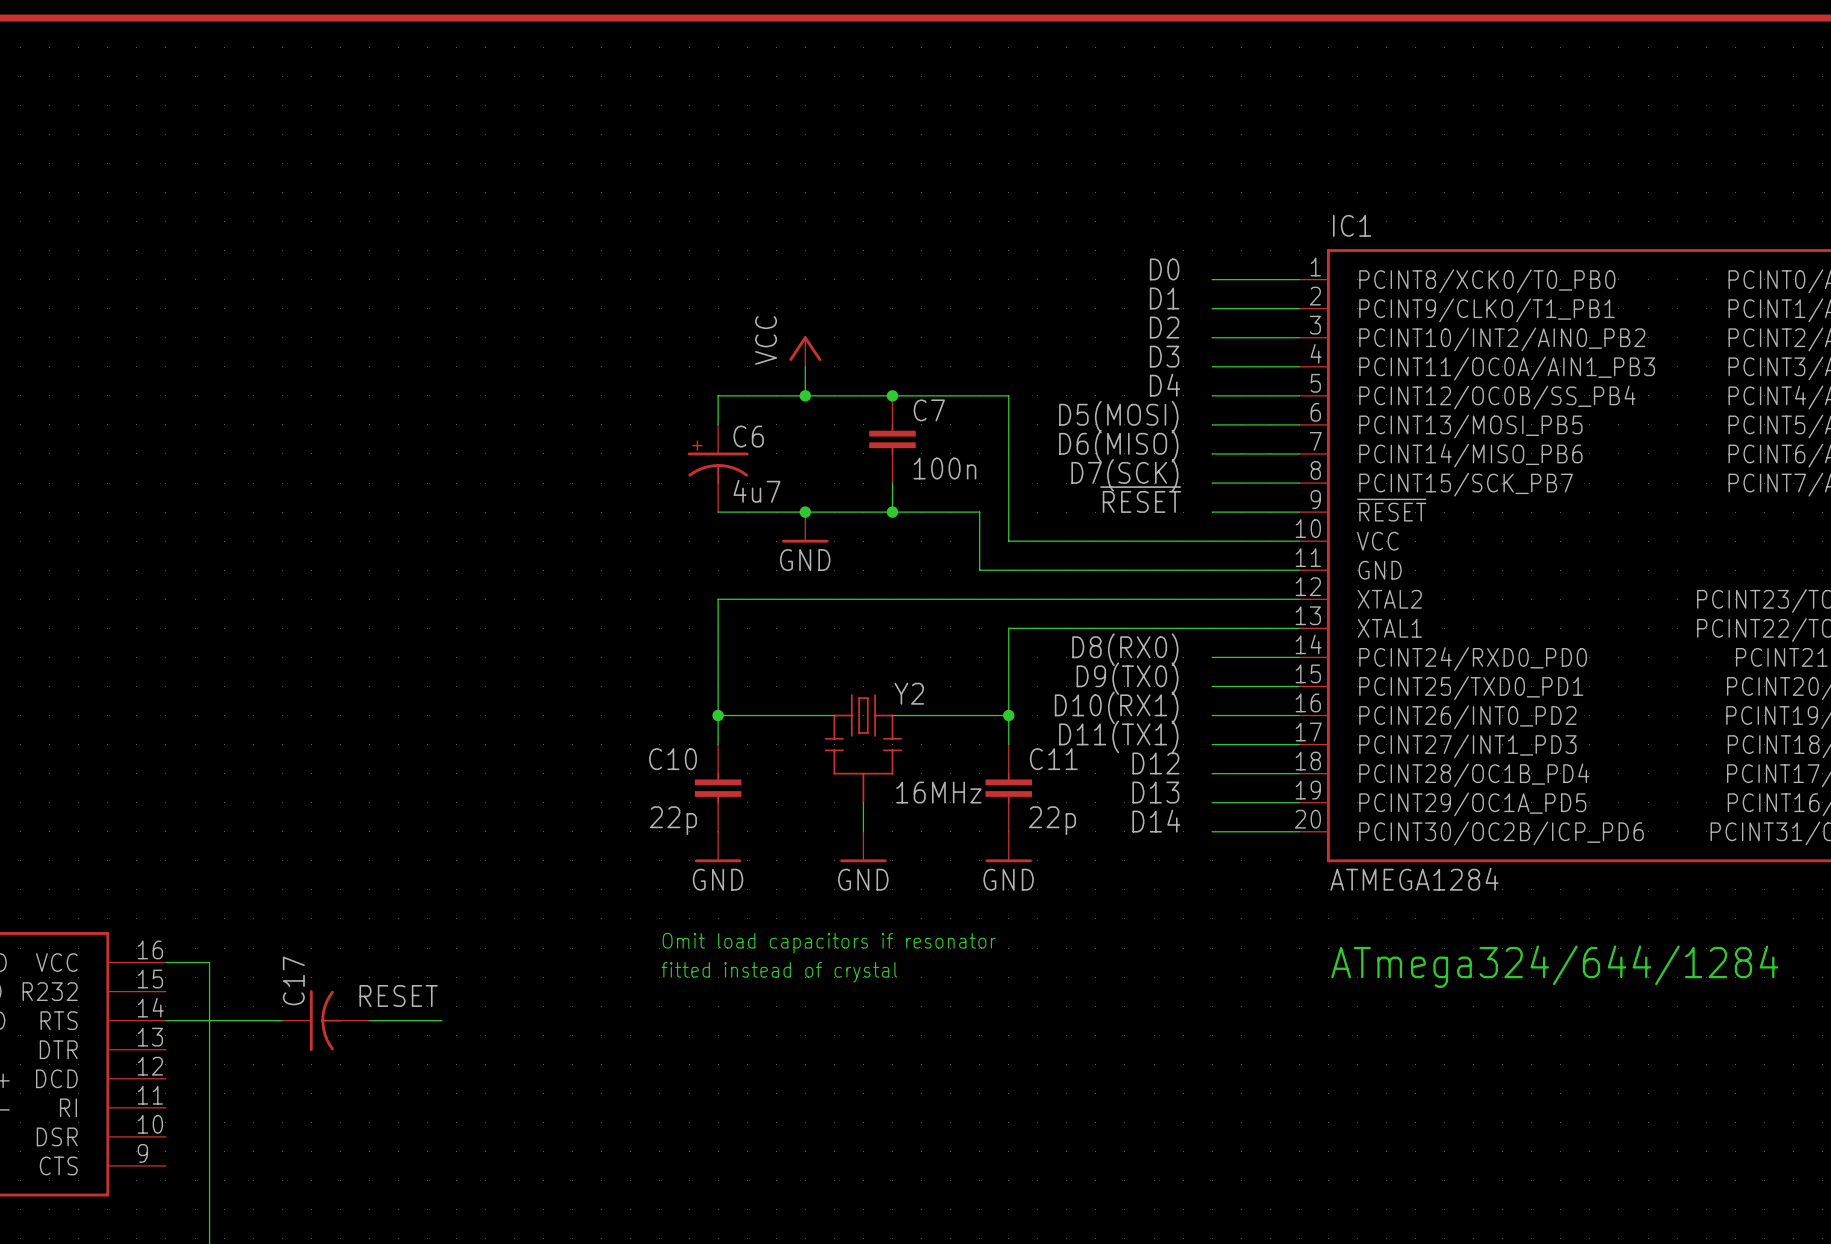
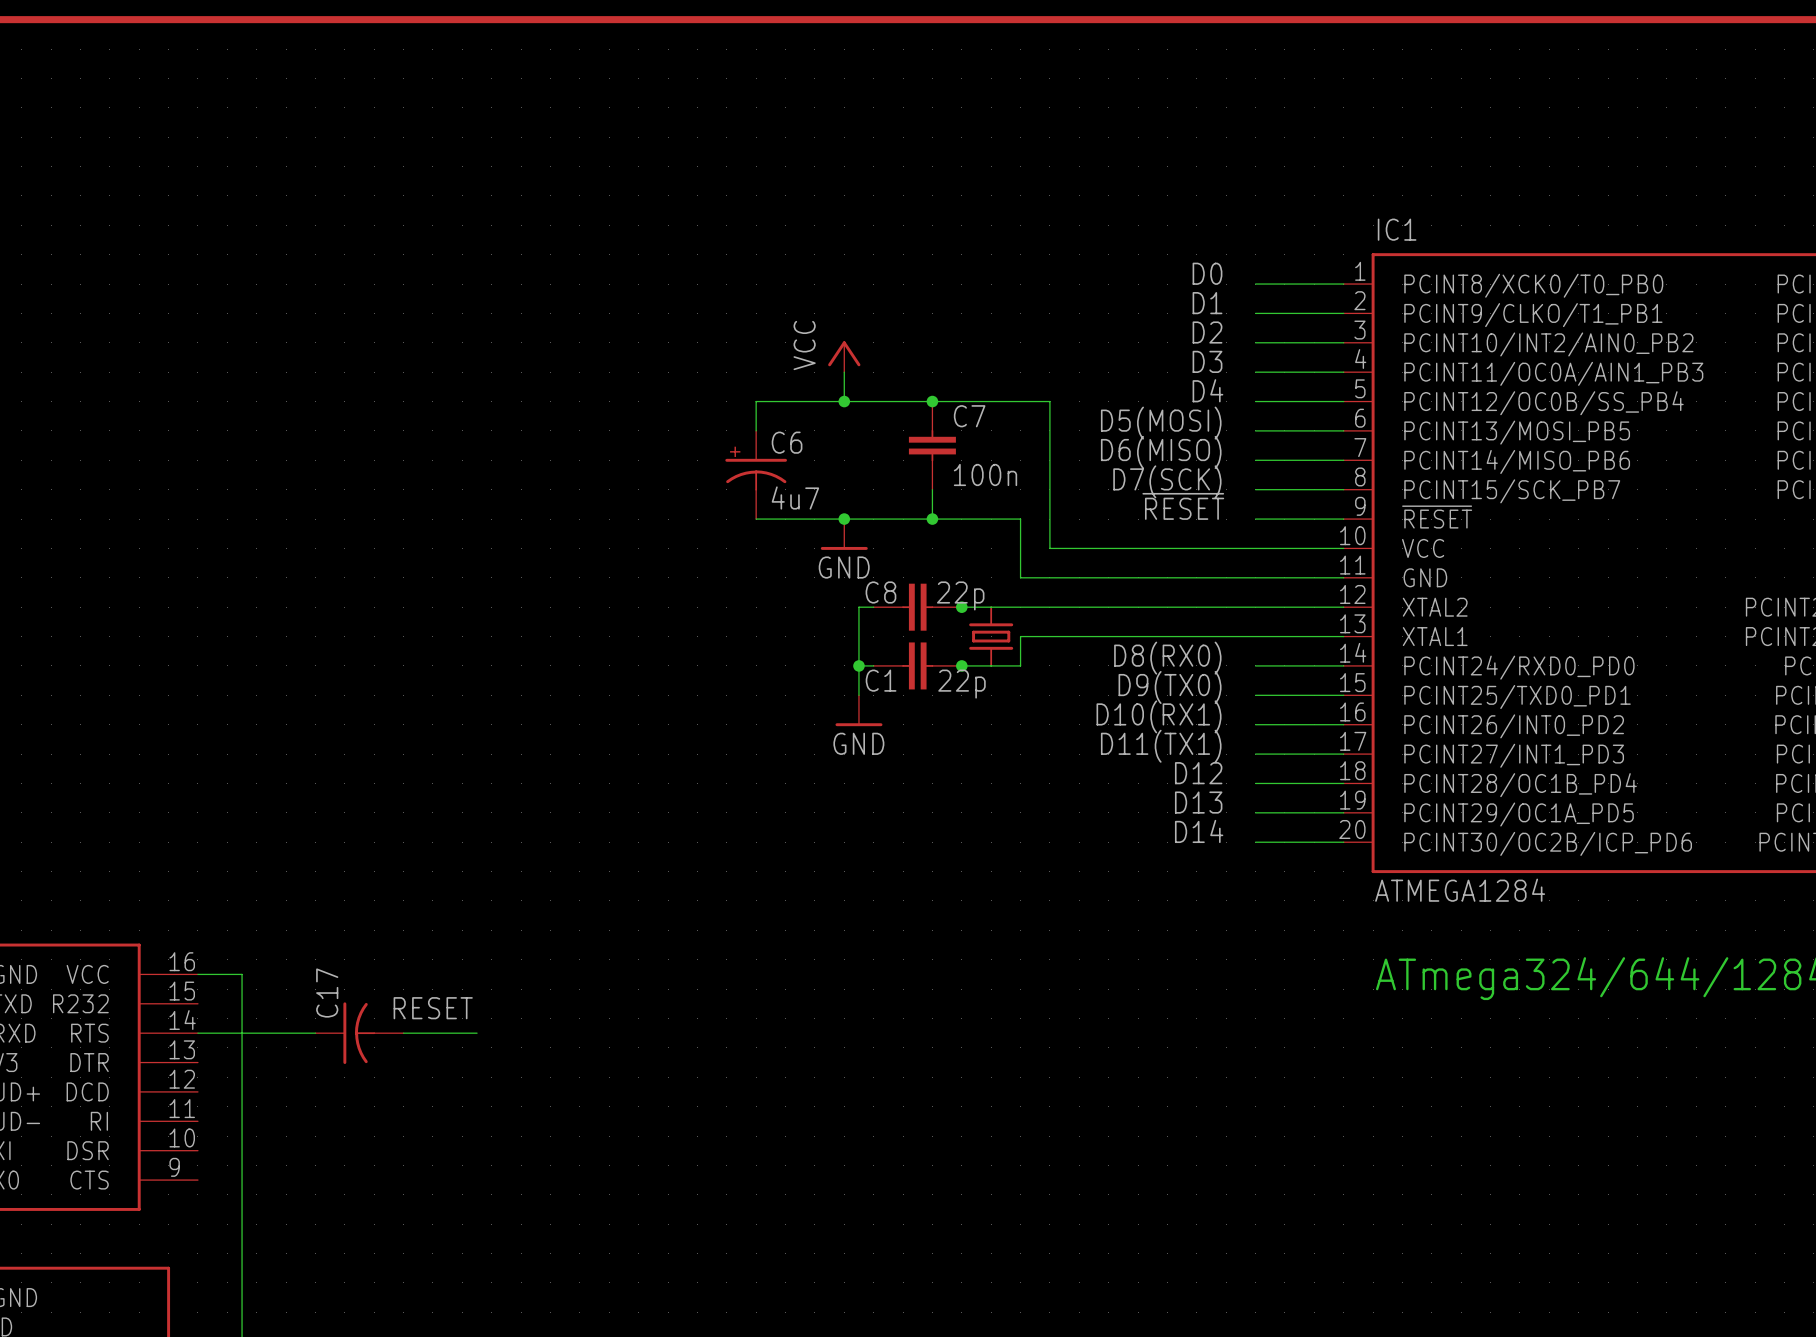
wire: (819, 599) (718, 599) (718, 744) -> (858, 607) (858, 695)
C8: none -> 22p (917, 607)
junction: none -> (961, 607)
part: none -> (991, 636)
wire: (1008, 628) (1008, 744) -> (1049, 636) (1020, 636) (1020, 665) (961, 665)
wire: none -> (858, 665) (873, 665)
junction: none -> (858, 665)
C1: none -> 22p (917, 665)
junction: none -> (961, 665)
power symbol: none -> GND (858, 710)
wire: (718, 715) (834, 715) -> none
junction: (718, 715) -> none
wire: (892, 715) (1008, 715) -> none
junction: (1008, 715) -> none
Y2: 16MHz (863, 748) -> none
C10: 22p (718, 788) -> none
C11: 22p (1008, 788) -> none
wire: (863, 802) (863, 831) -> none
power symbol: GND (718, 847) -> none
power symbol: GND (863, 847) -> none
power symbol: GND (1008, 847) -> none
text: Omit load capacitors if resonator (829, 943) -> none
text: fitted instead of crystal (779, 972) -> none

